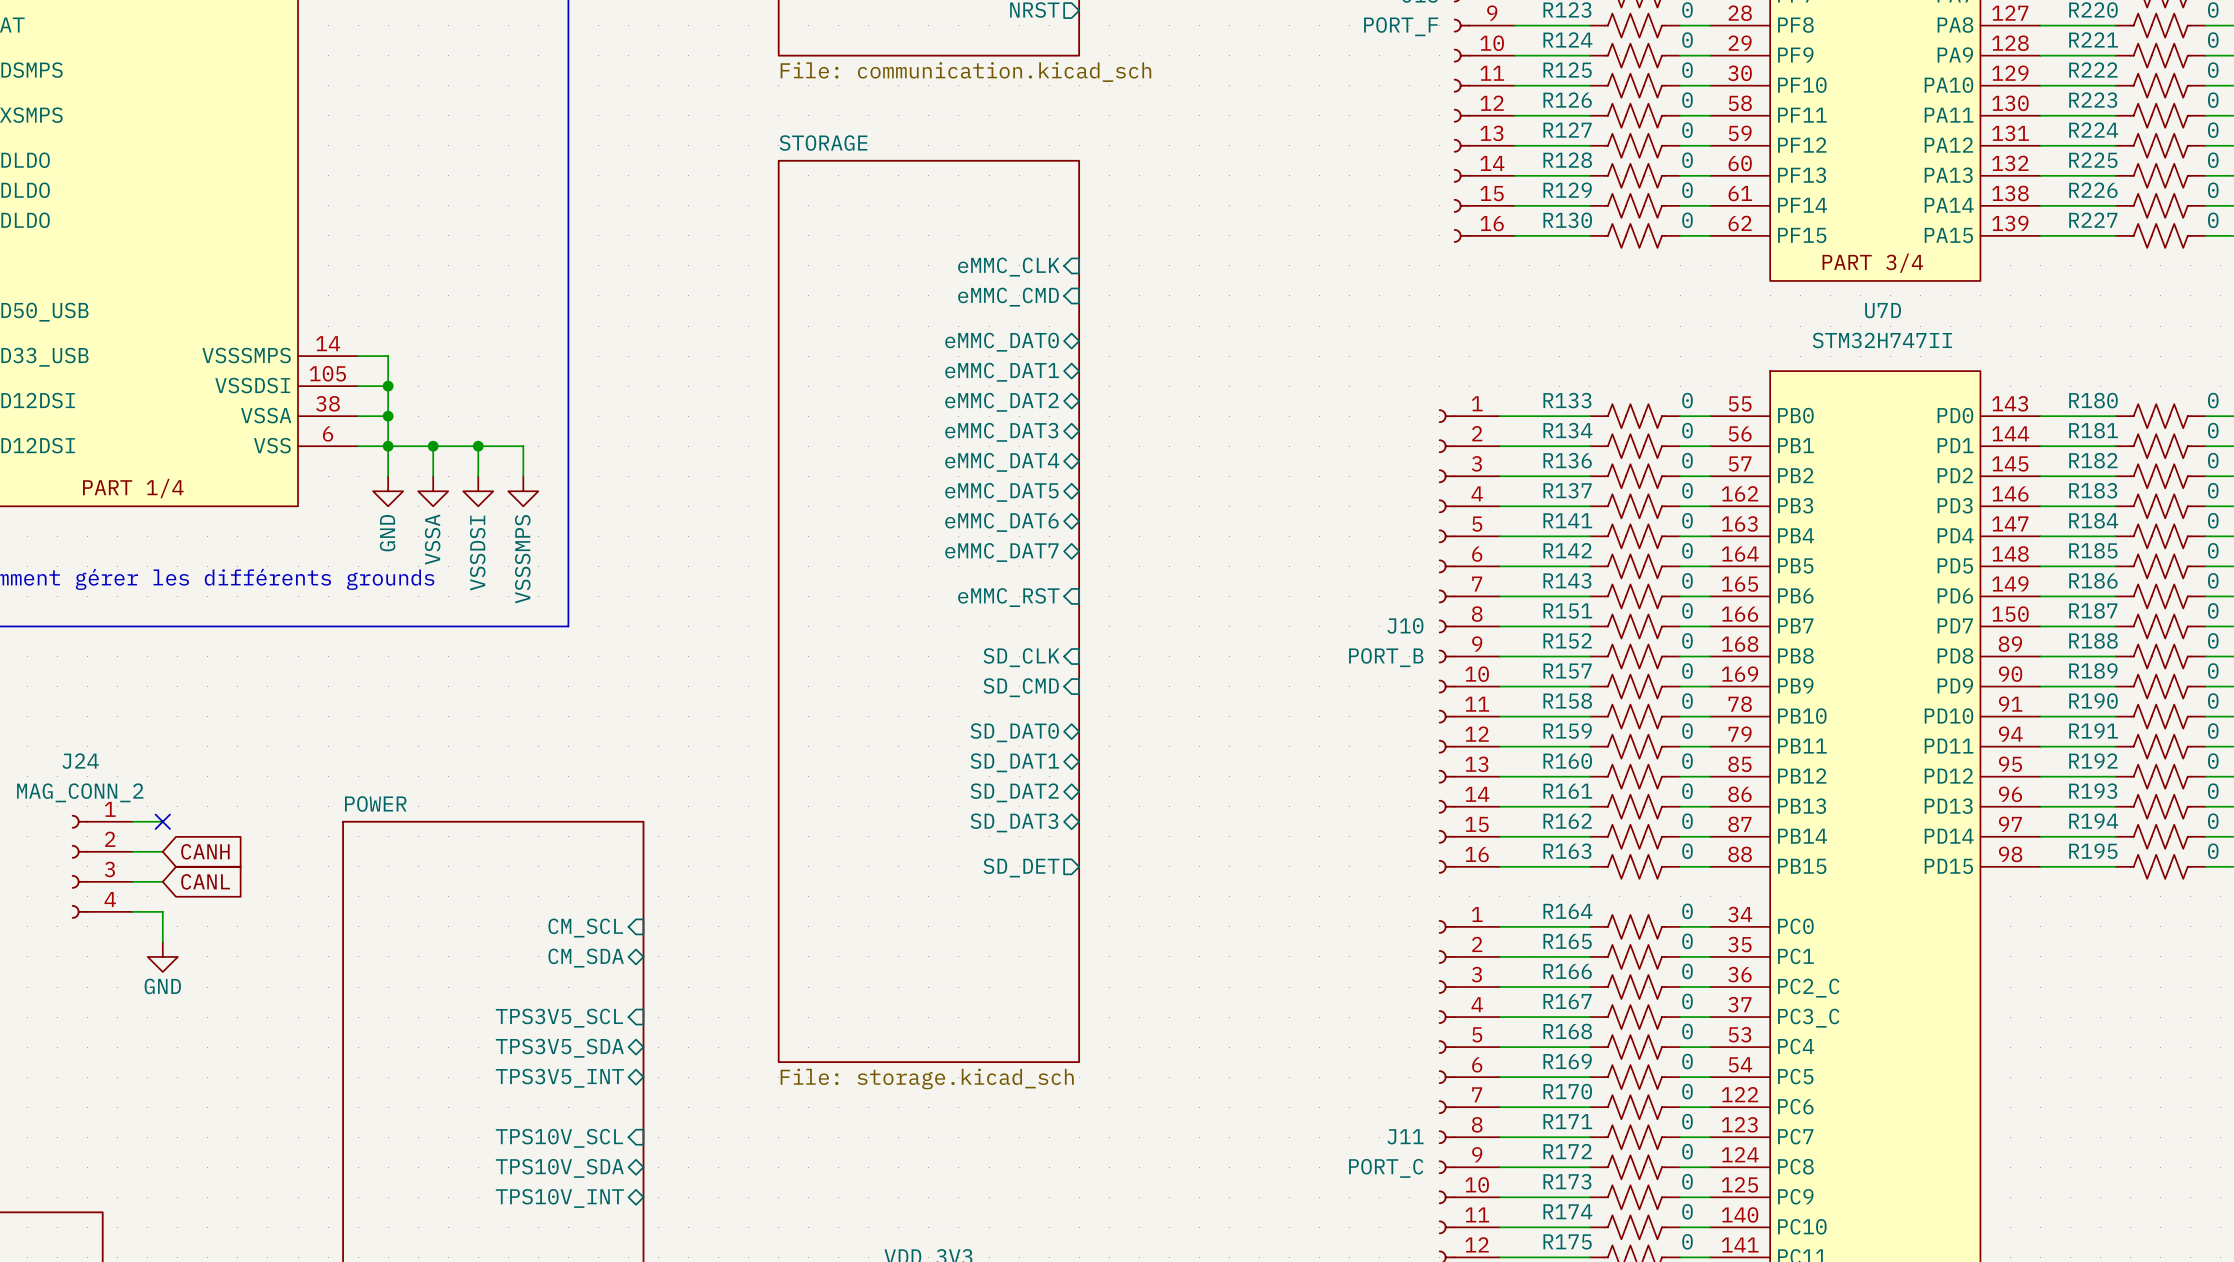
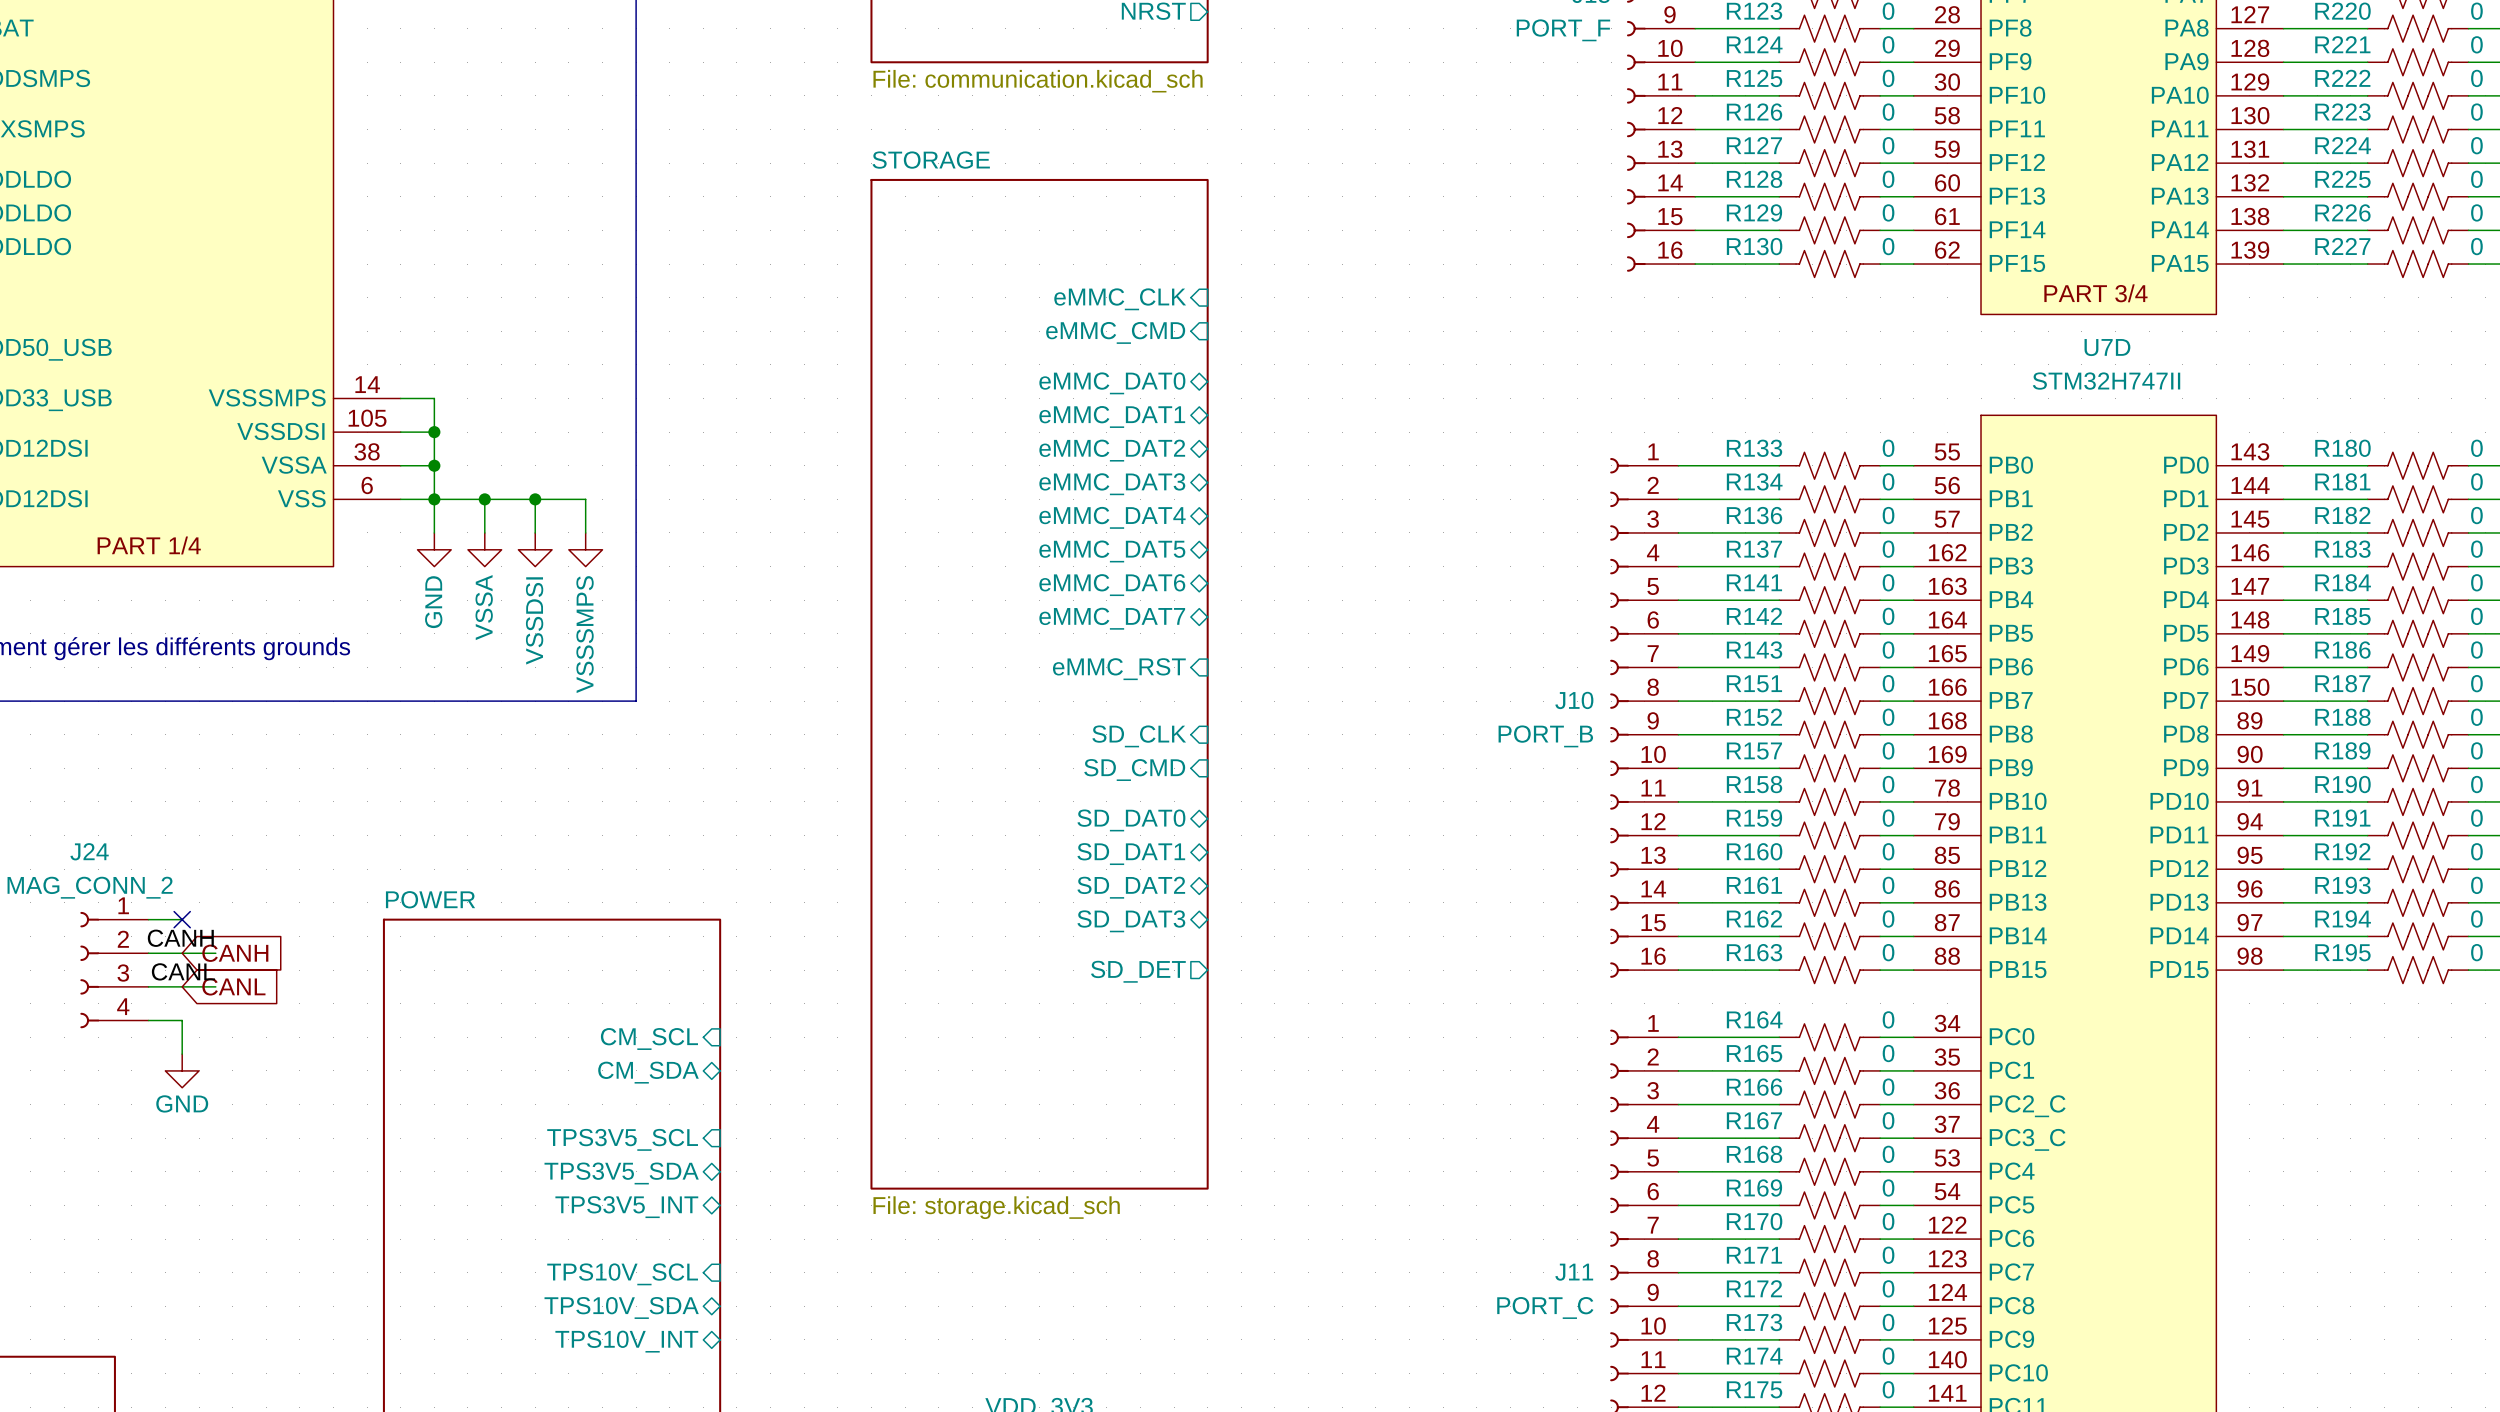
label: none -> CANH (180, 938)
wire: none -> (182, 953) (215, 953)
label: none -> CANL (183, 971)
wire: none -> (182, 986) (215, 986)

